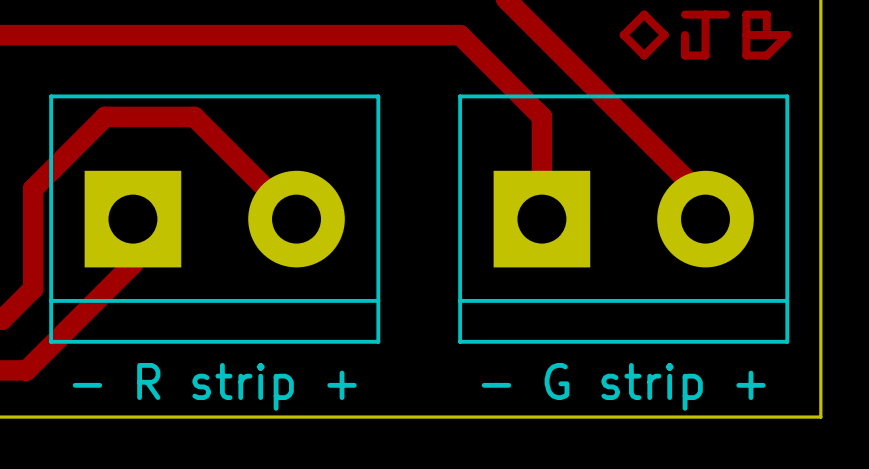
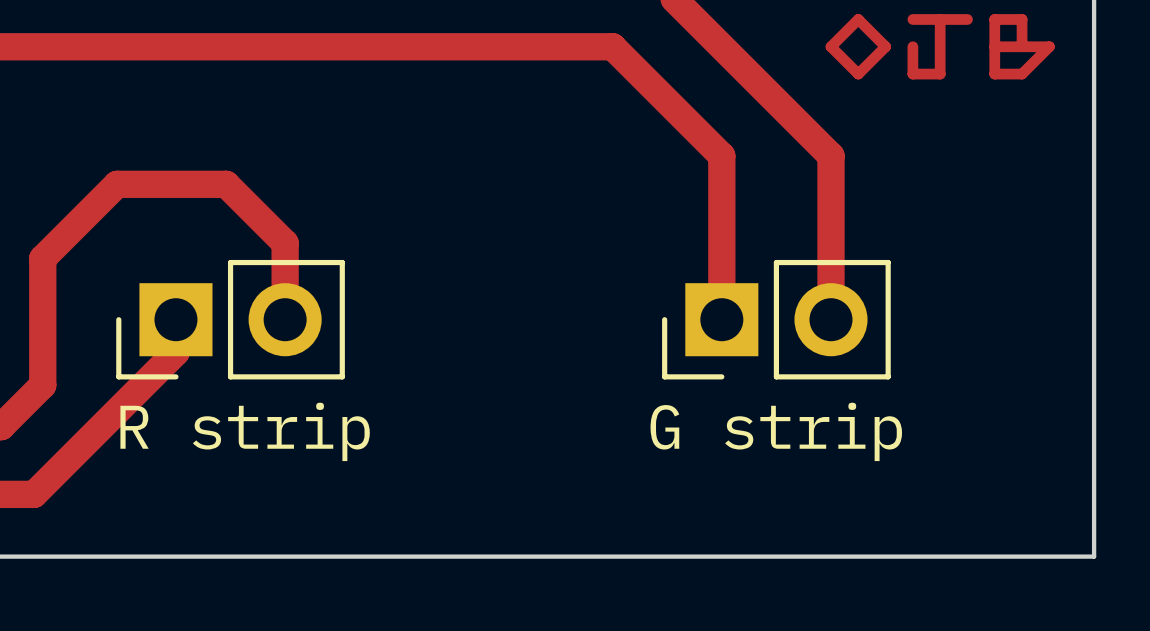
top track: (623, 116) (705, 198) (705, 219) -> (831, 155) (831, 319)
top track: (33, 193) (33, 188) (105, 116) (194, 116) (296, 219) -> (42, 258) (117, 184) (226, 184) (285, 243) (285, 319)
part: - R strip + (214, 219) -> none
part: - G strip + (623, 219) -> none
part: none -> R strip (230, 319)
part: none -> G strip (776, 319)

